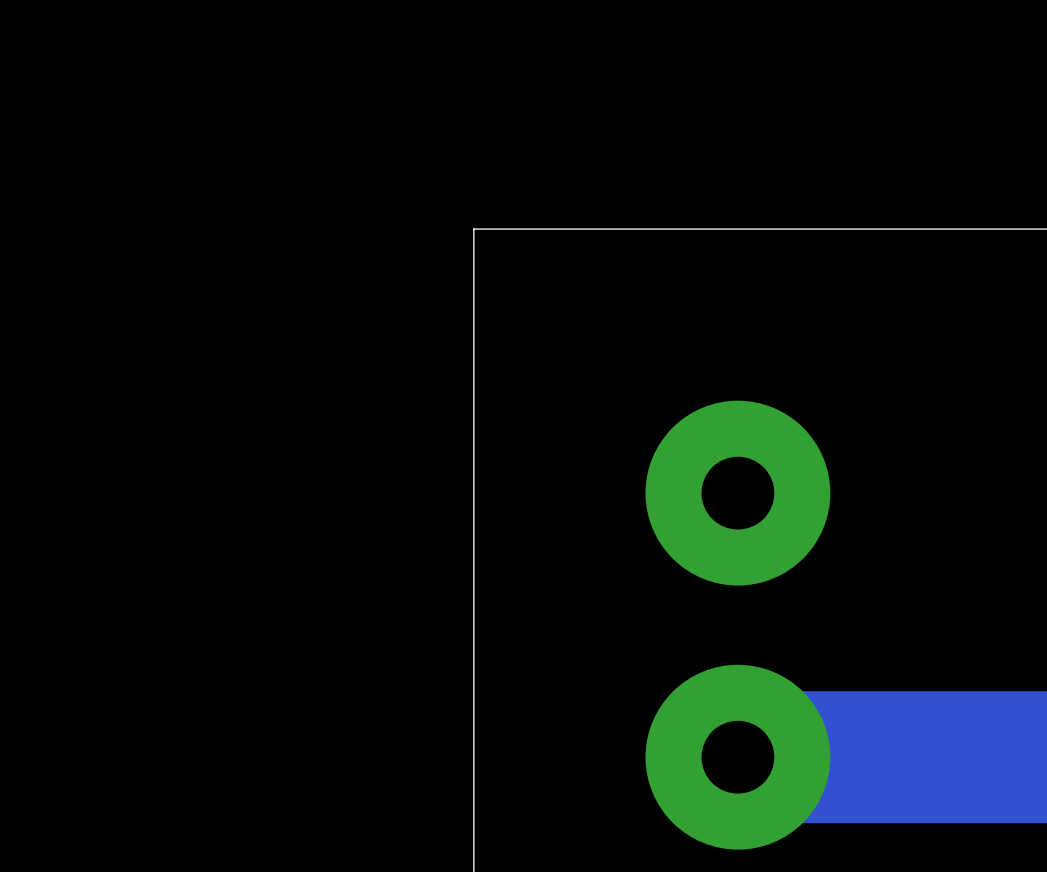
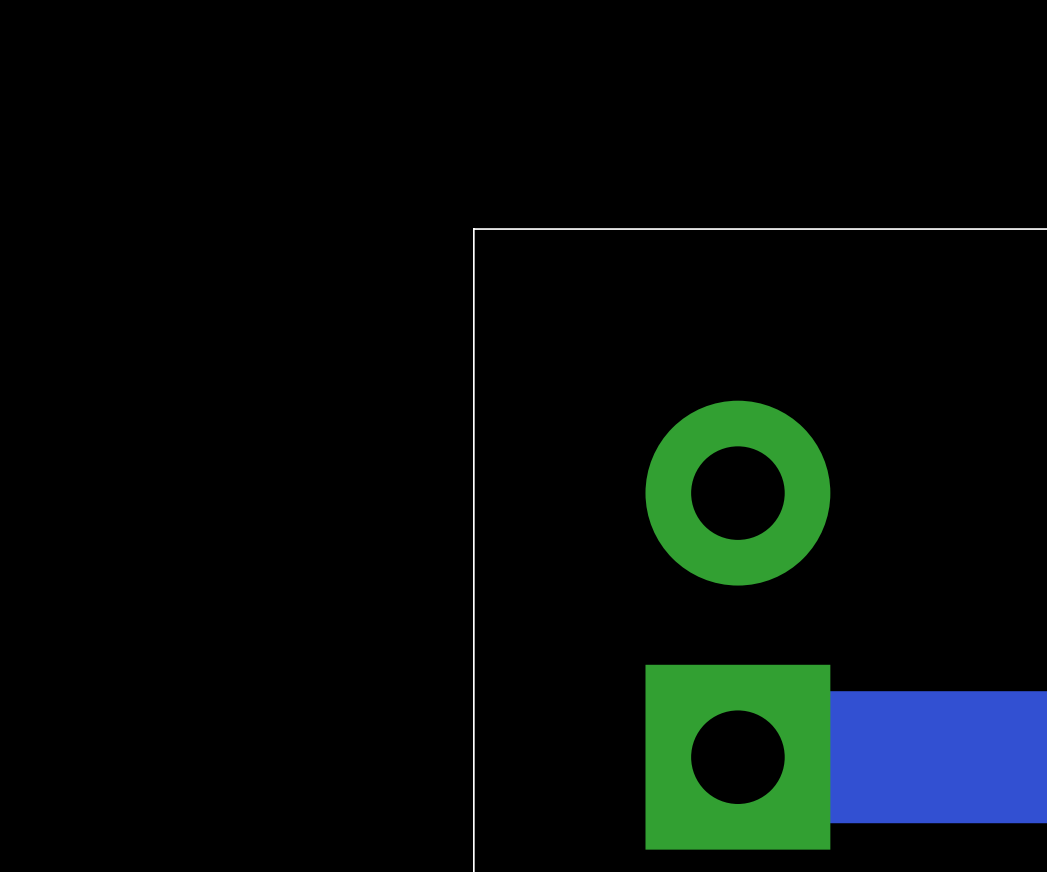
part footprint: [645, 400, 831, 850] -> [645, 400, 831, 850]

